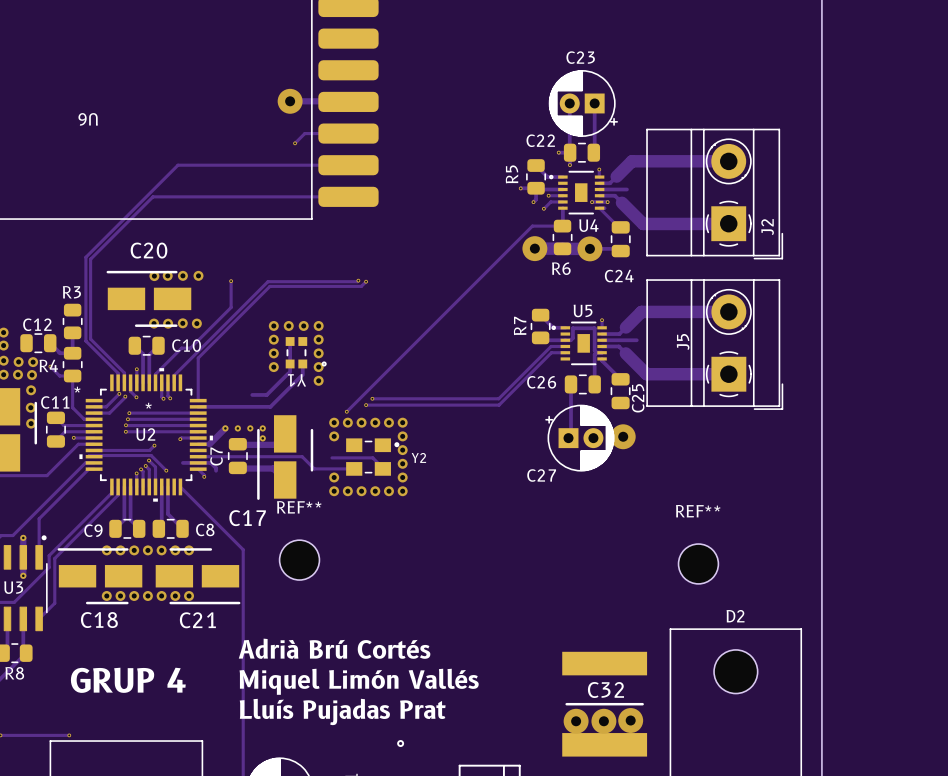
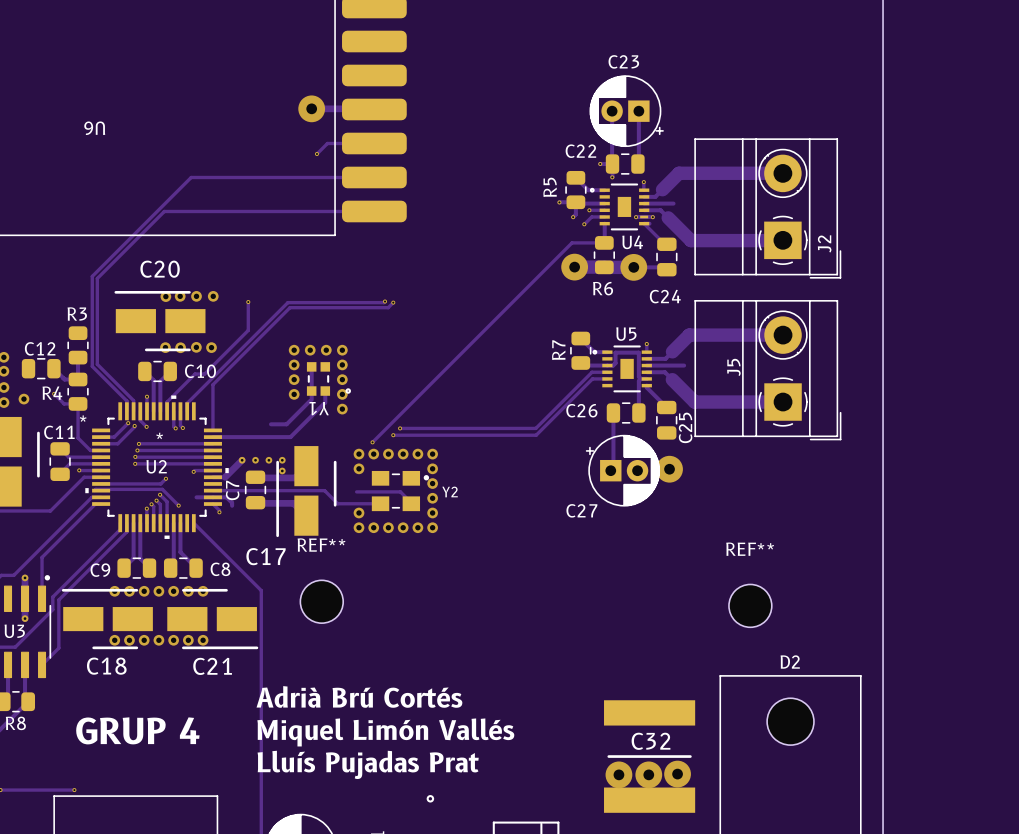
via: (18, 361) -> none
via: (33, 362) -> none
via: none -> (23, 399)
via: (18, 374) -> none
via: (32, 375) -> none
via: (31, 390) -> none
via: (30, 407) -> none
via: (31, 423) -> none

